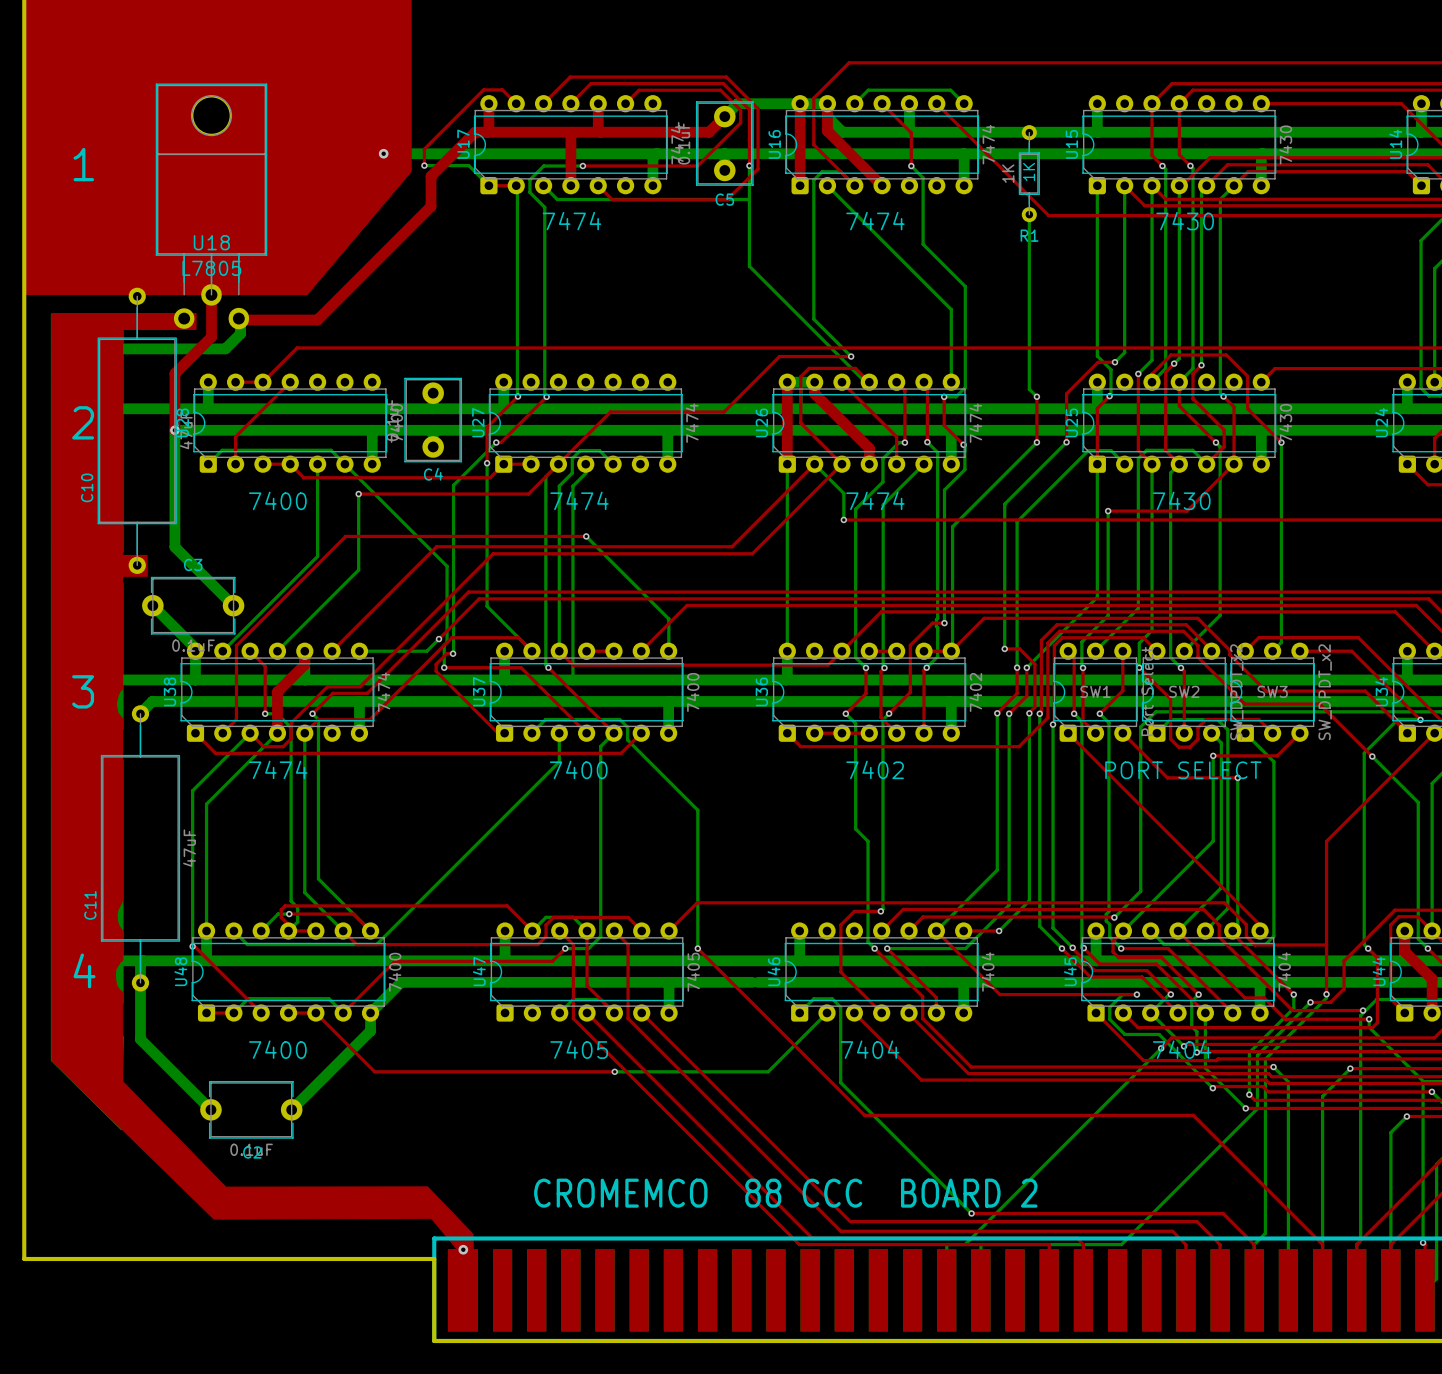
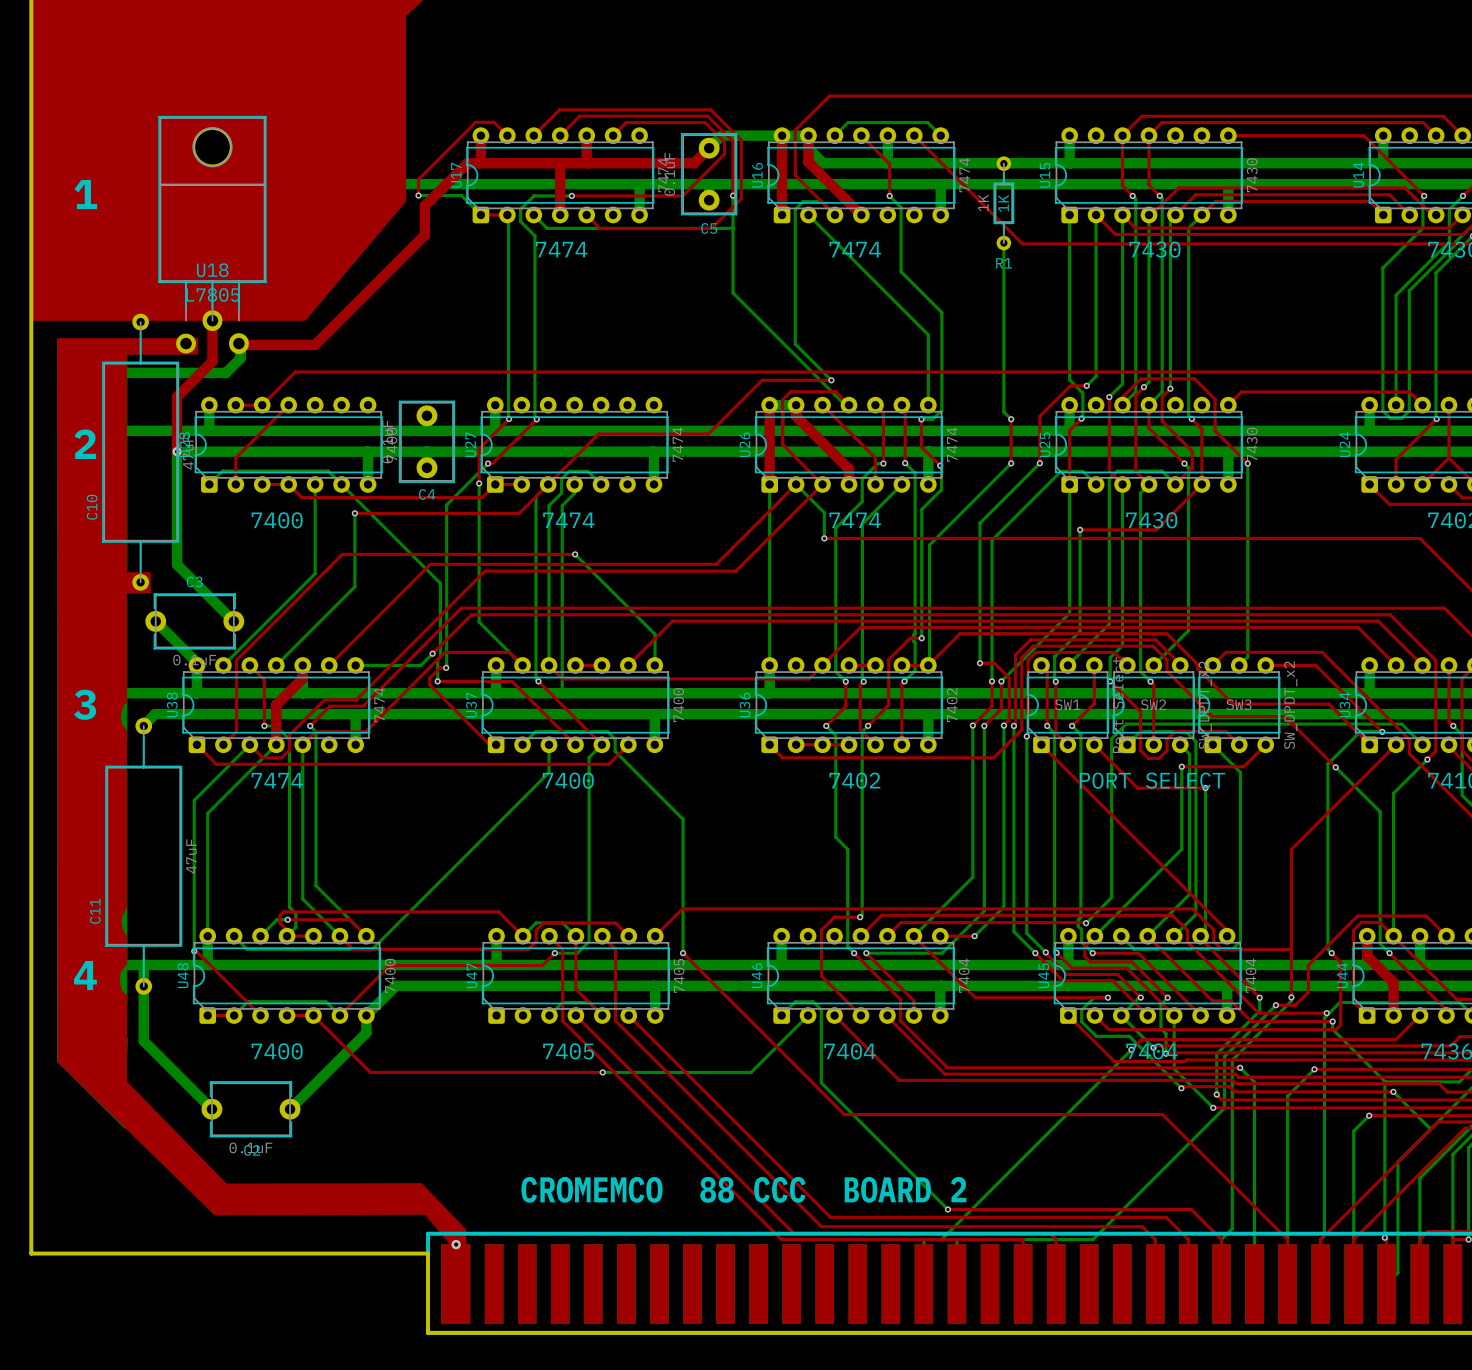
via: (383, 153) -> none

